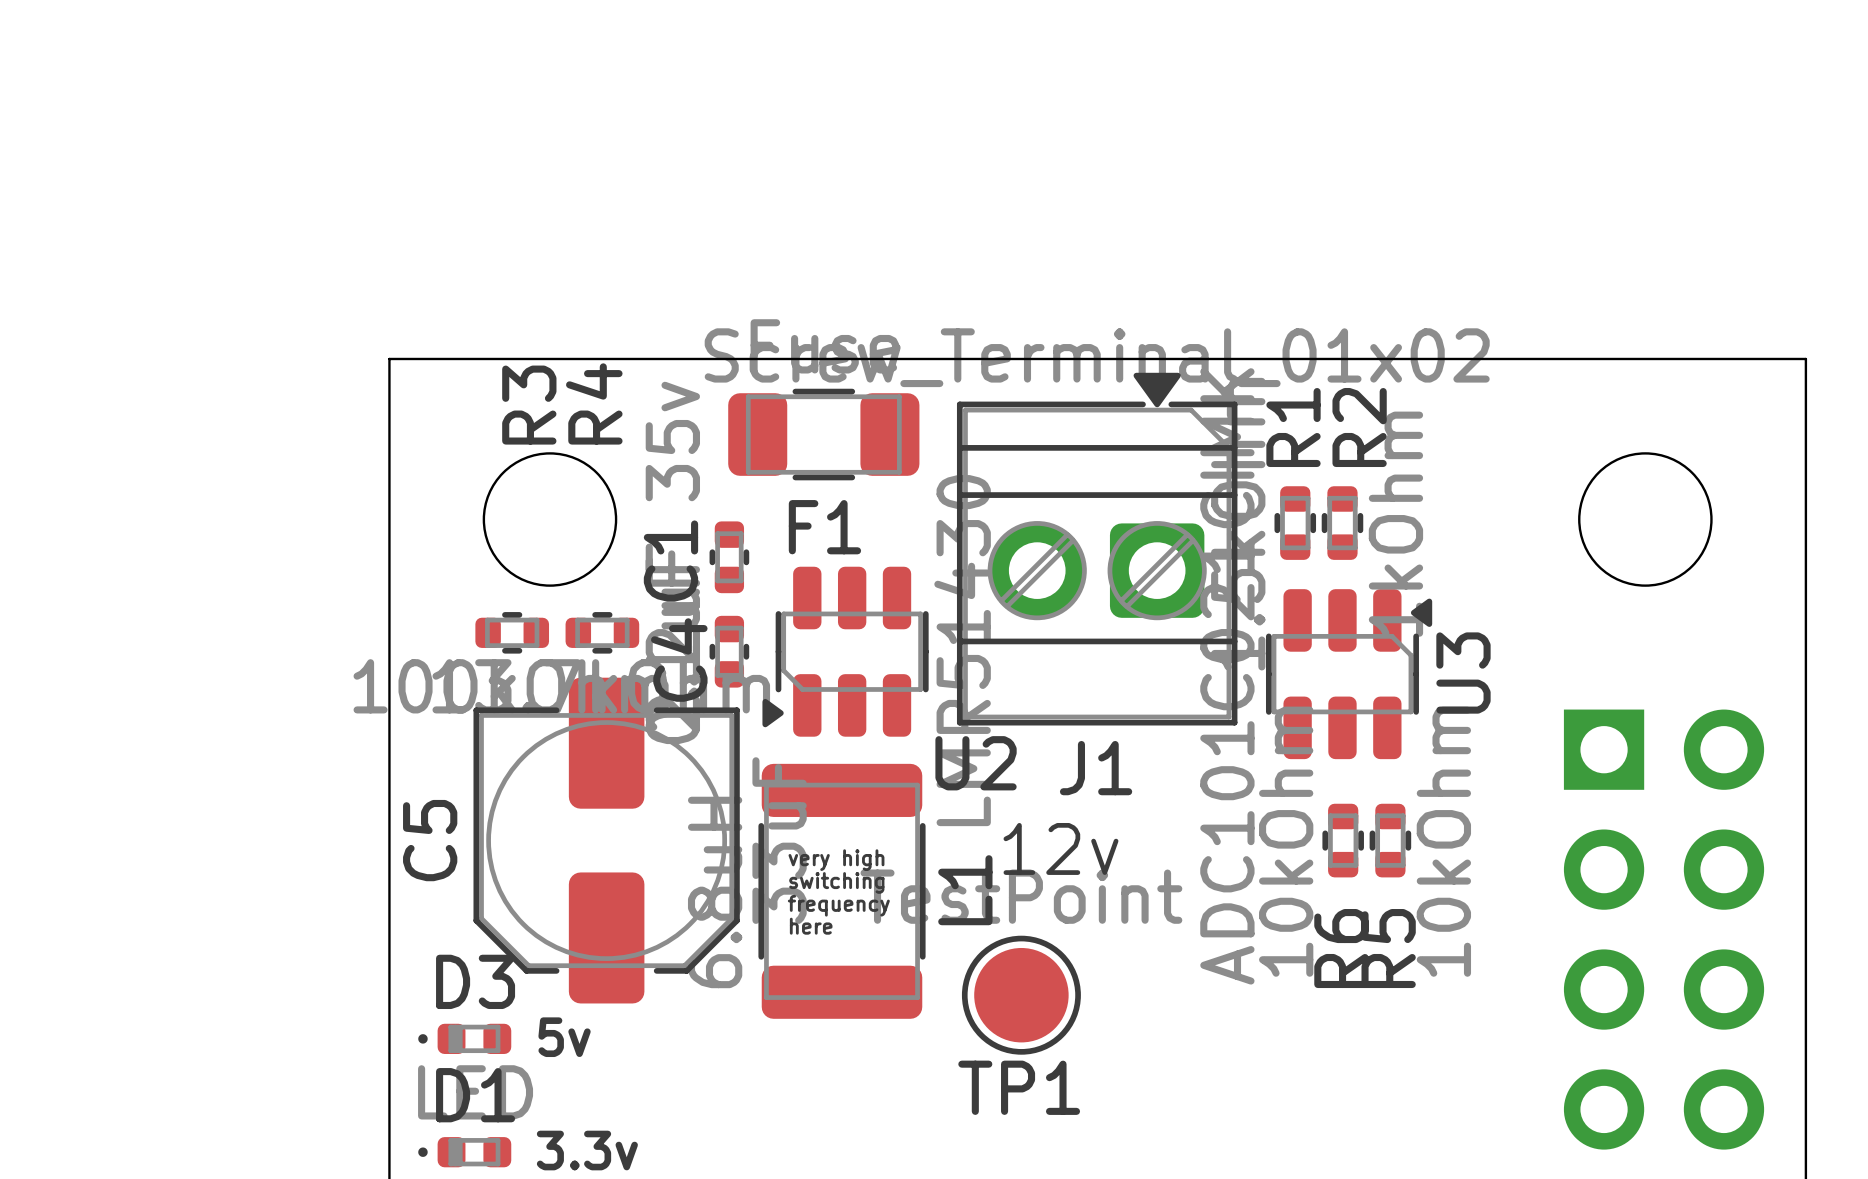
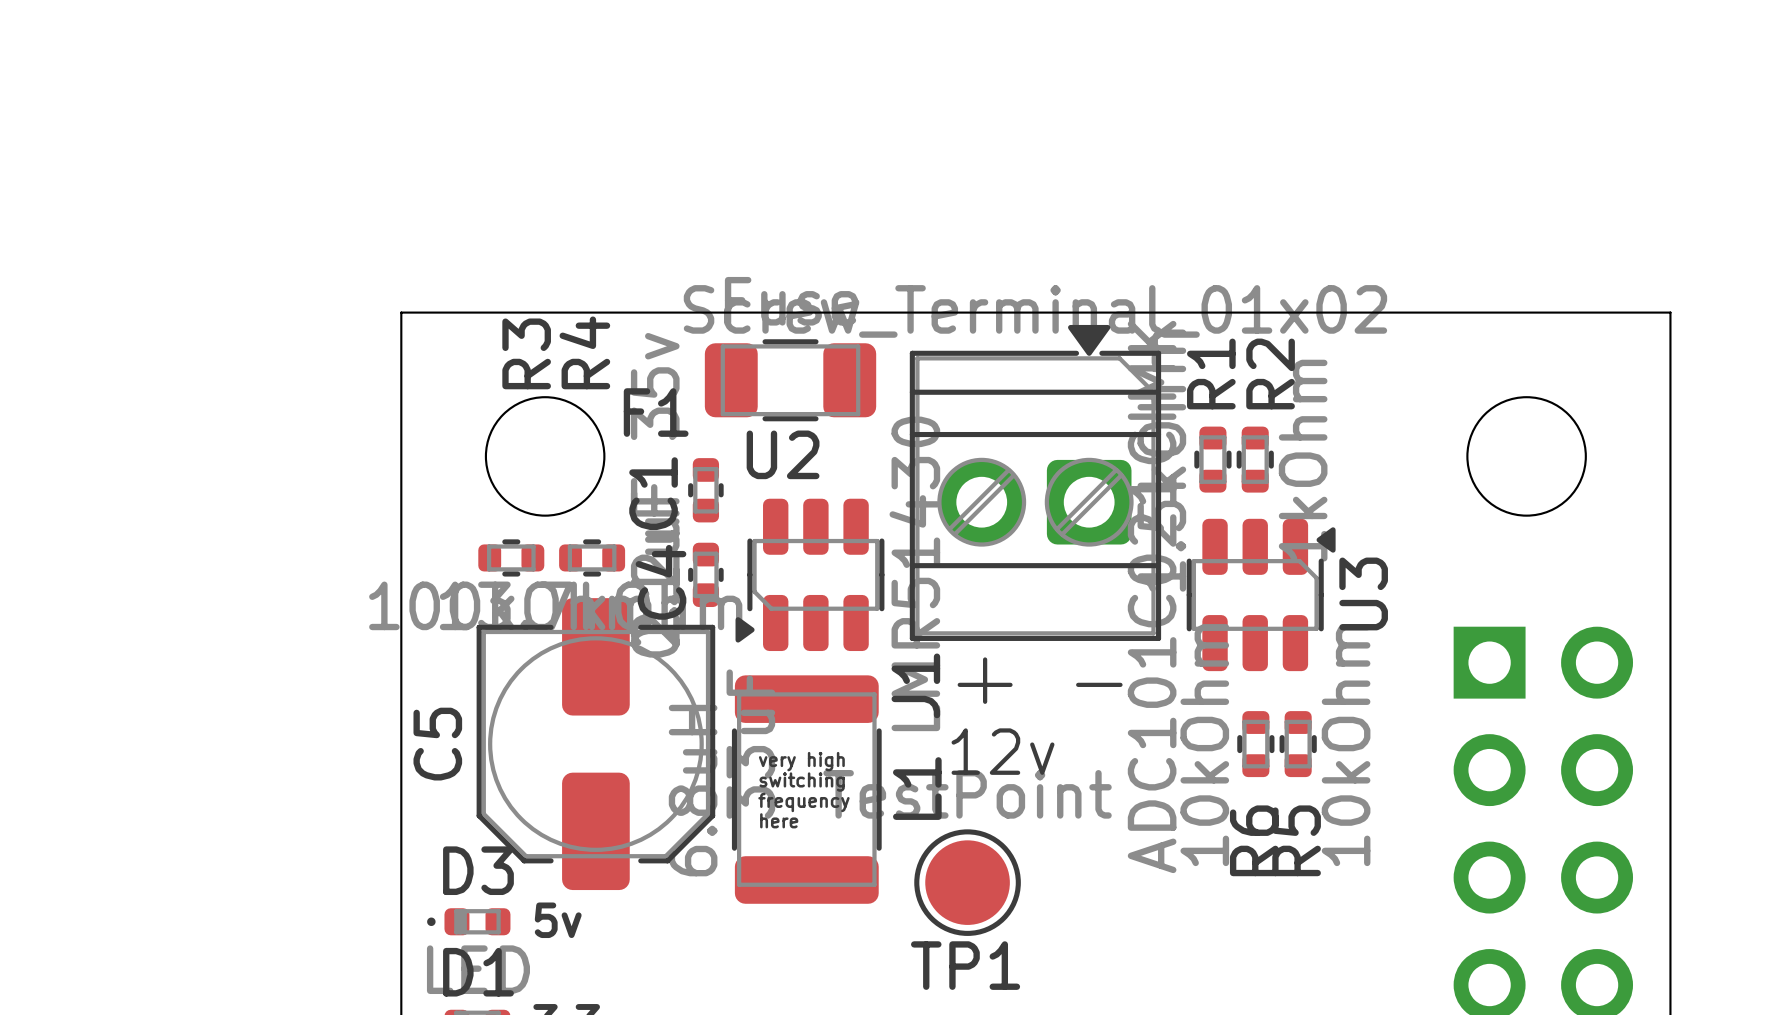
F1 name position: F1 (824, 527) -> F1 (656, 412)
line: none -> (985, 659) (985, 701)
U2 name position: U2 (976, 763) -> U2 (783, 454)
J1 name rotation: 0° (1096, 768) -> 90° counterclockwise (915, 685)
J1 name position: J1 (1096, 768) -> J1 (915, 685)
line: none -> (959, 684) (1010, 684)
line: none -> (1078, 684) (1120, 684)

